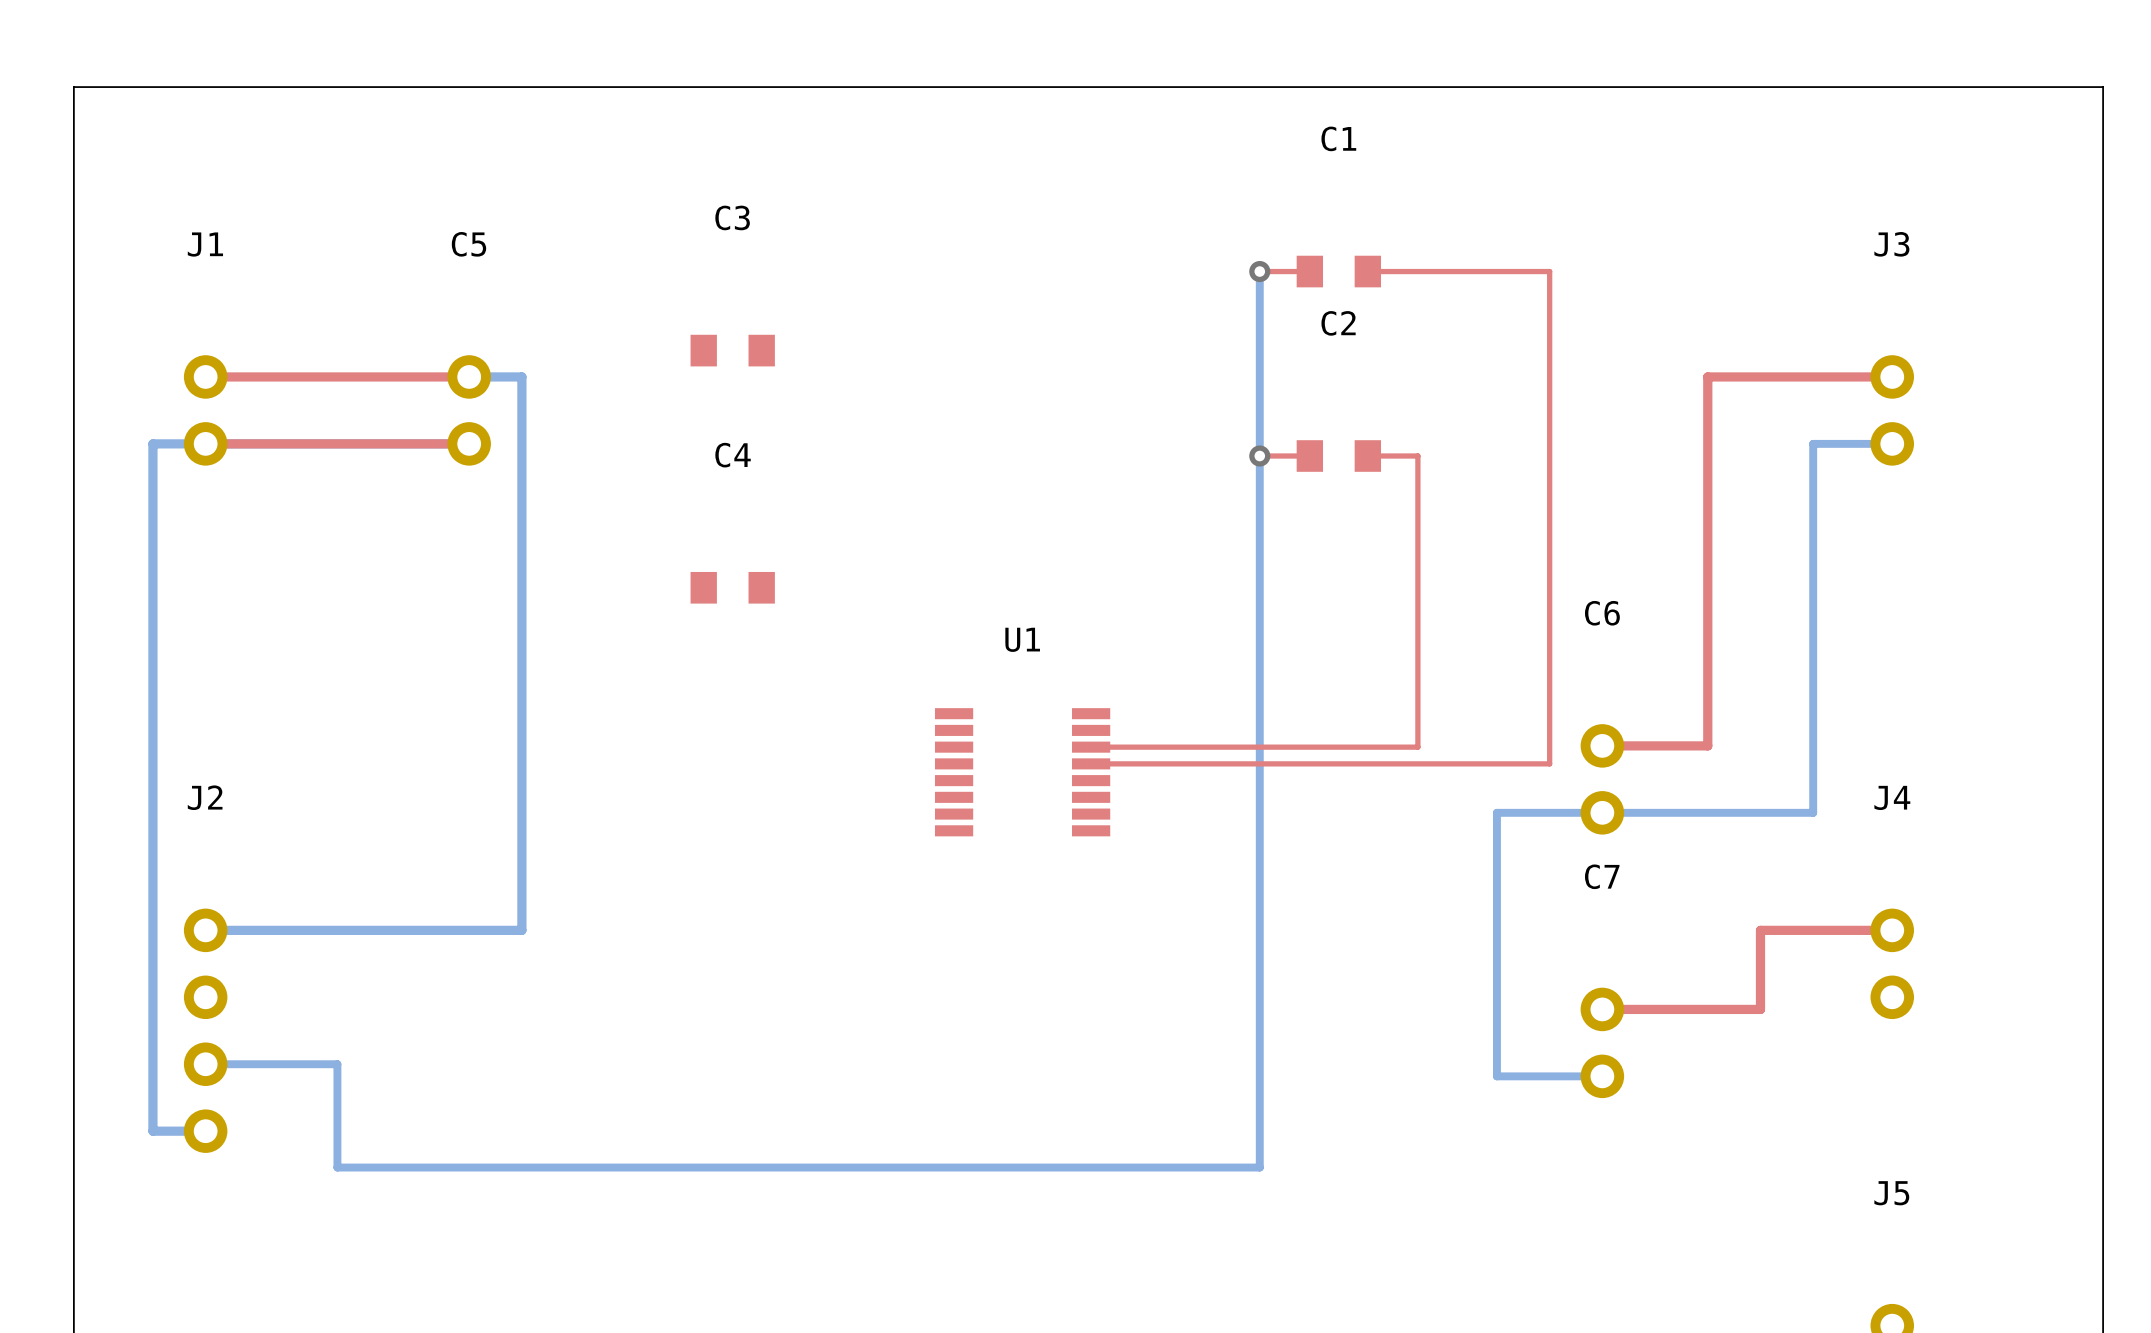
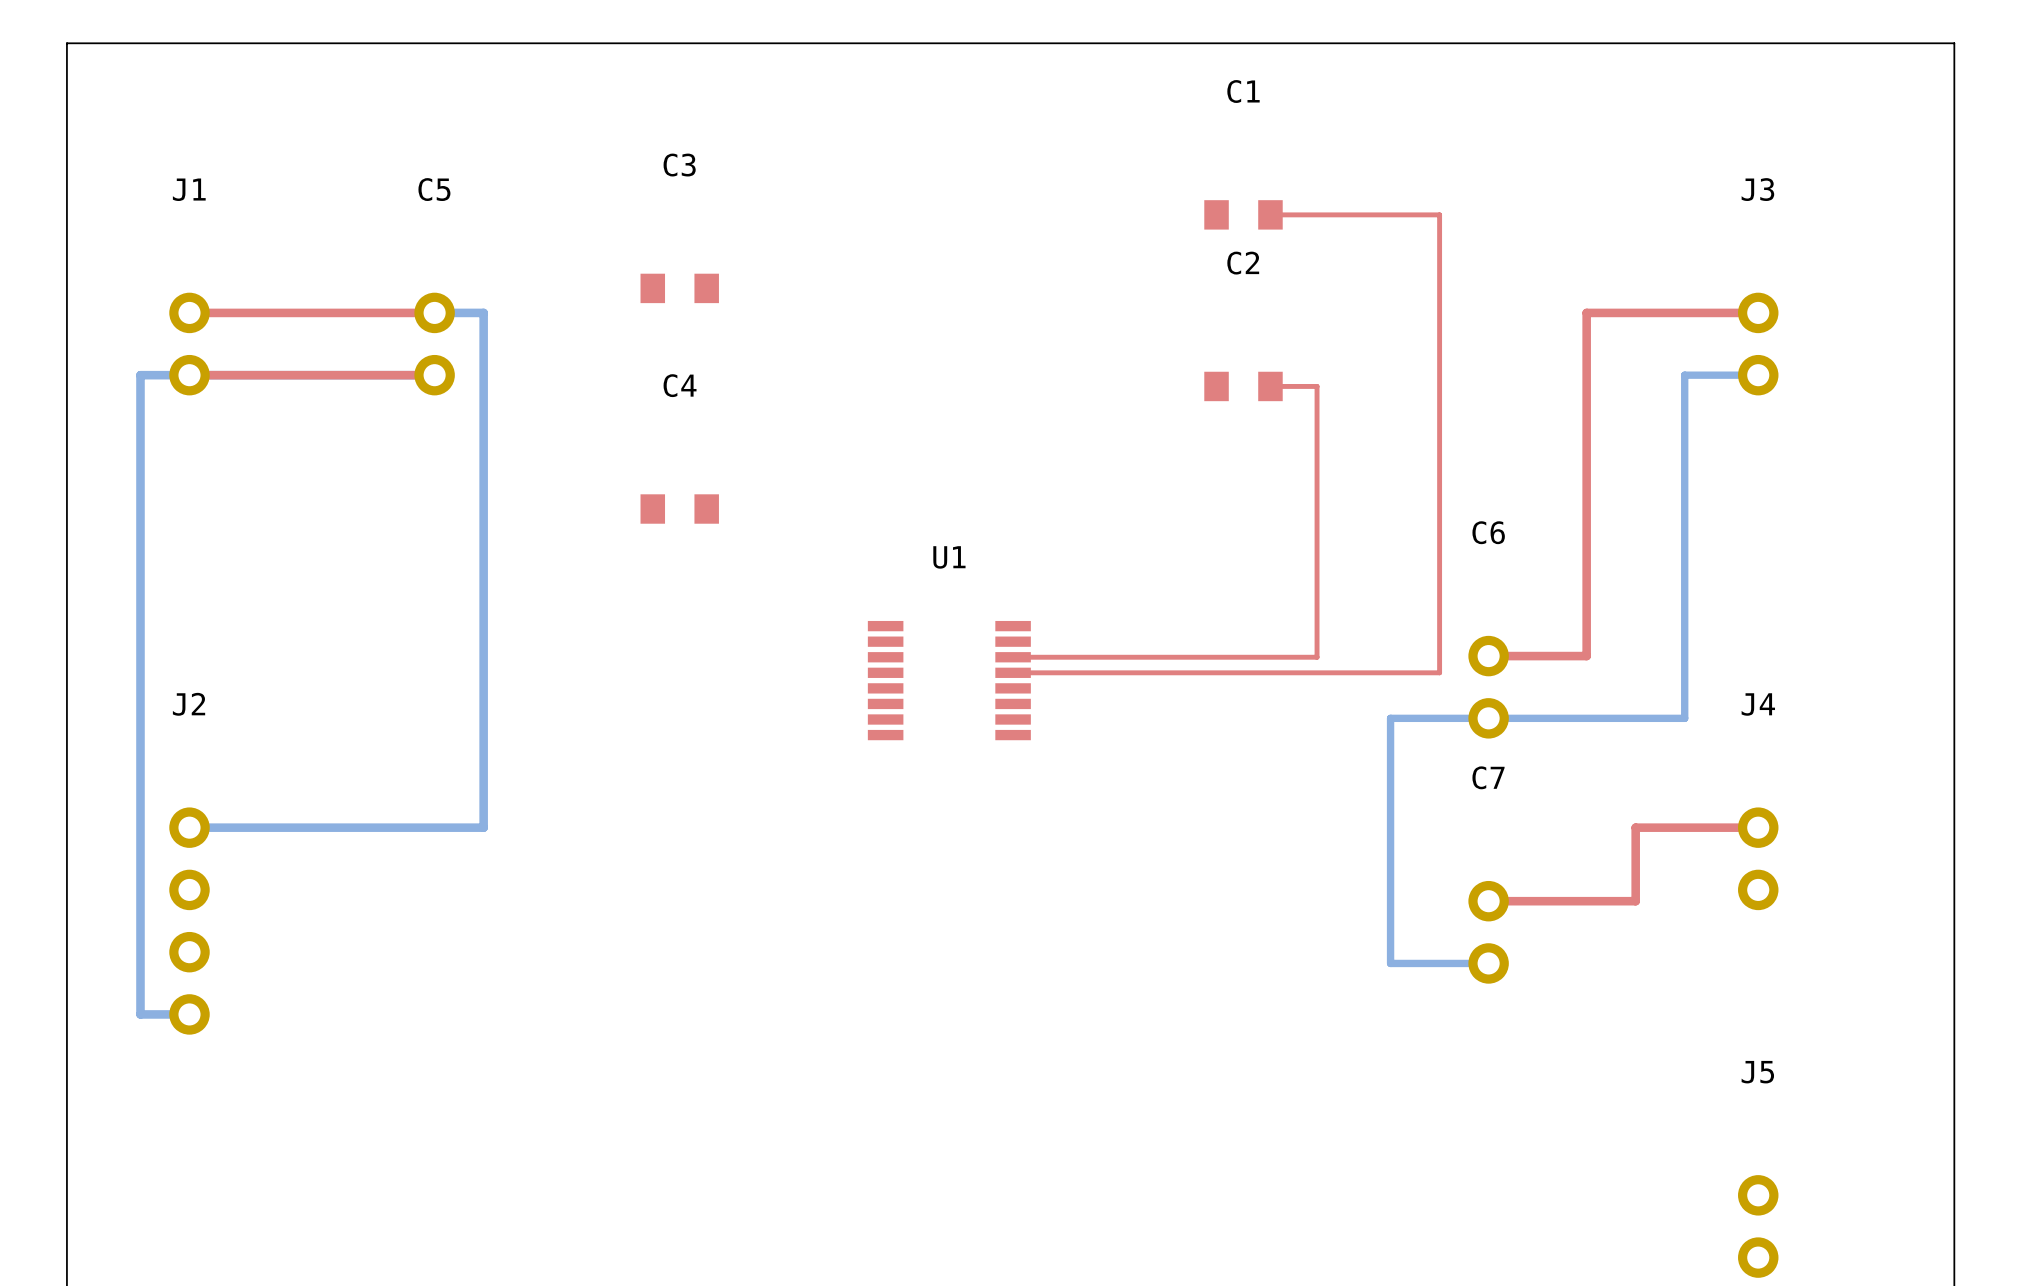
top track: (1259, 271) (1309, 271) -> none
bottom track: (1259, 271) (1259, 1167) (337, 1167) (337, 1064) (205, 1064) -> none
via: (1259, 271) -> none
top track: (1259, 456) (1309, 456) -> none
via: (1259, 456) -> none

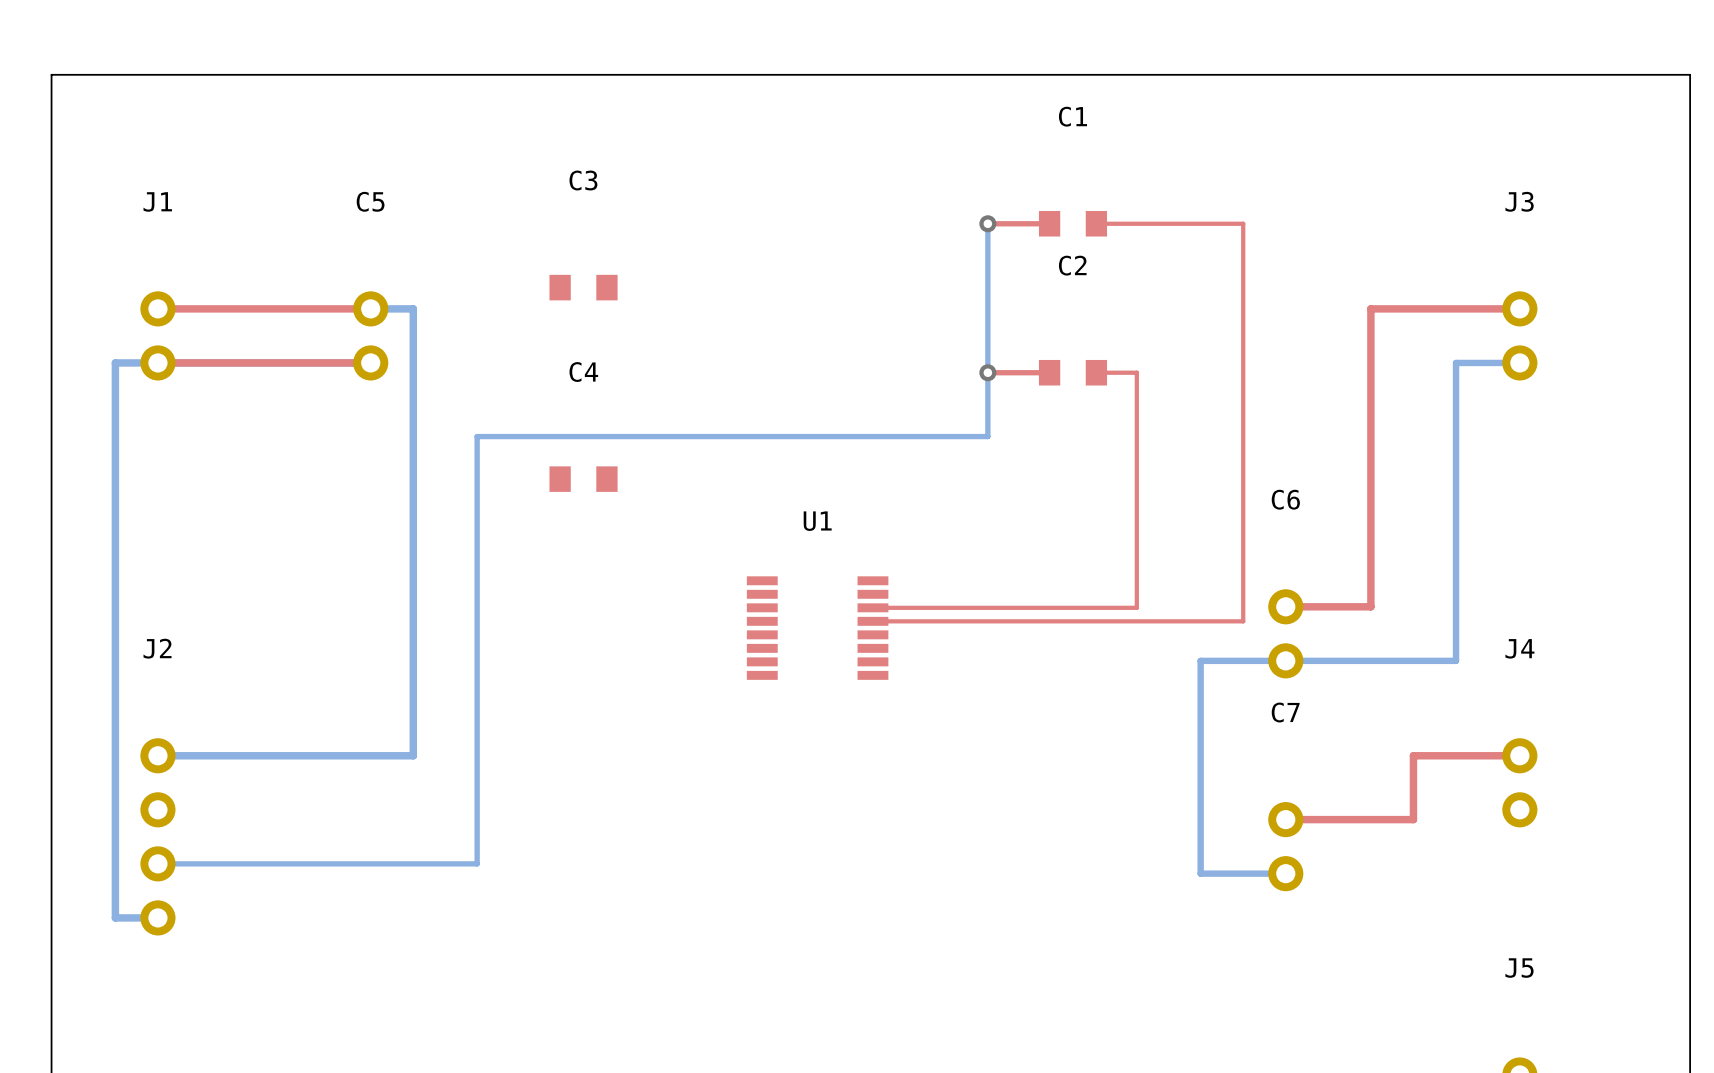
top track: none -> (987, 223) (1049, 223)
bottom track: none -> (987, 223) (987, 436) (477, 436) (477, 863) (157, 863)
via: none -> (987, 223)
top track: none -> (987, 372) (1049, 372)
via: none -> (987, 372)

